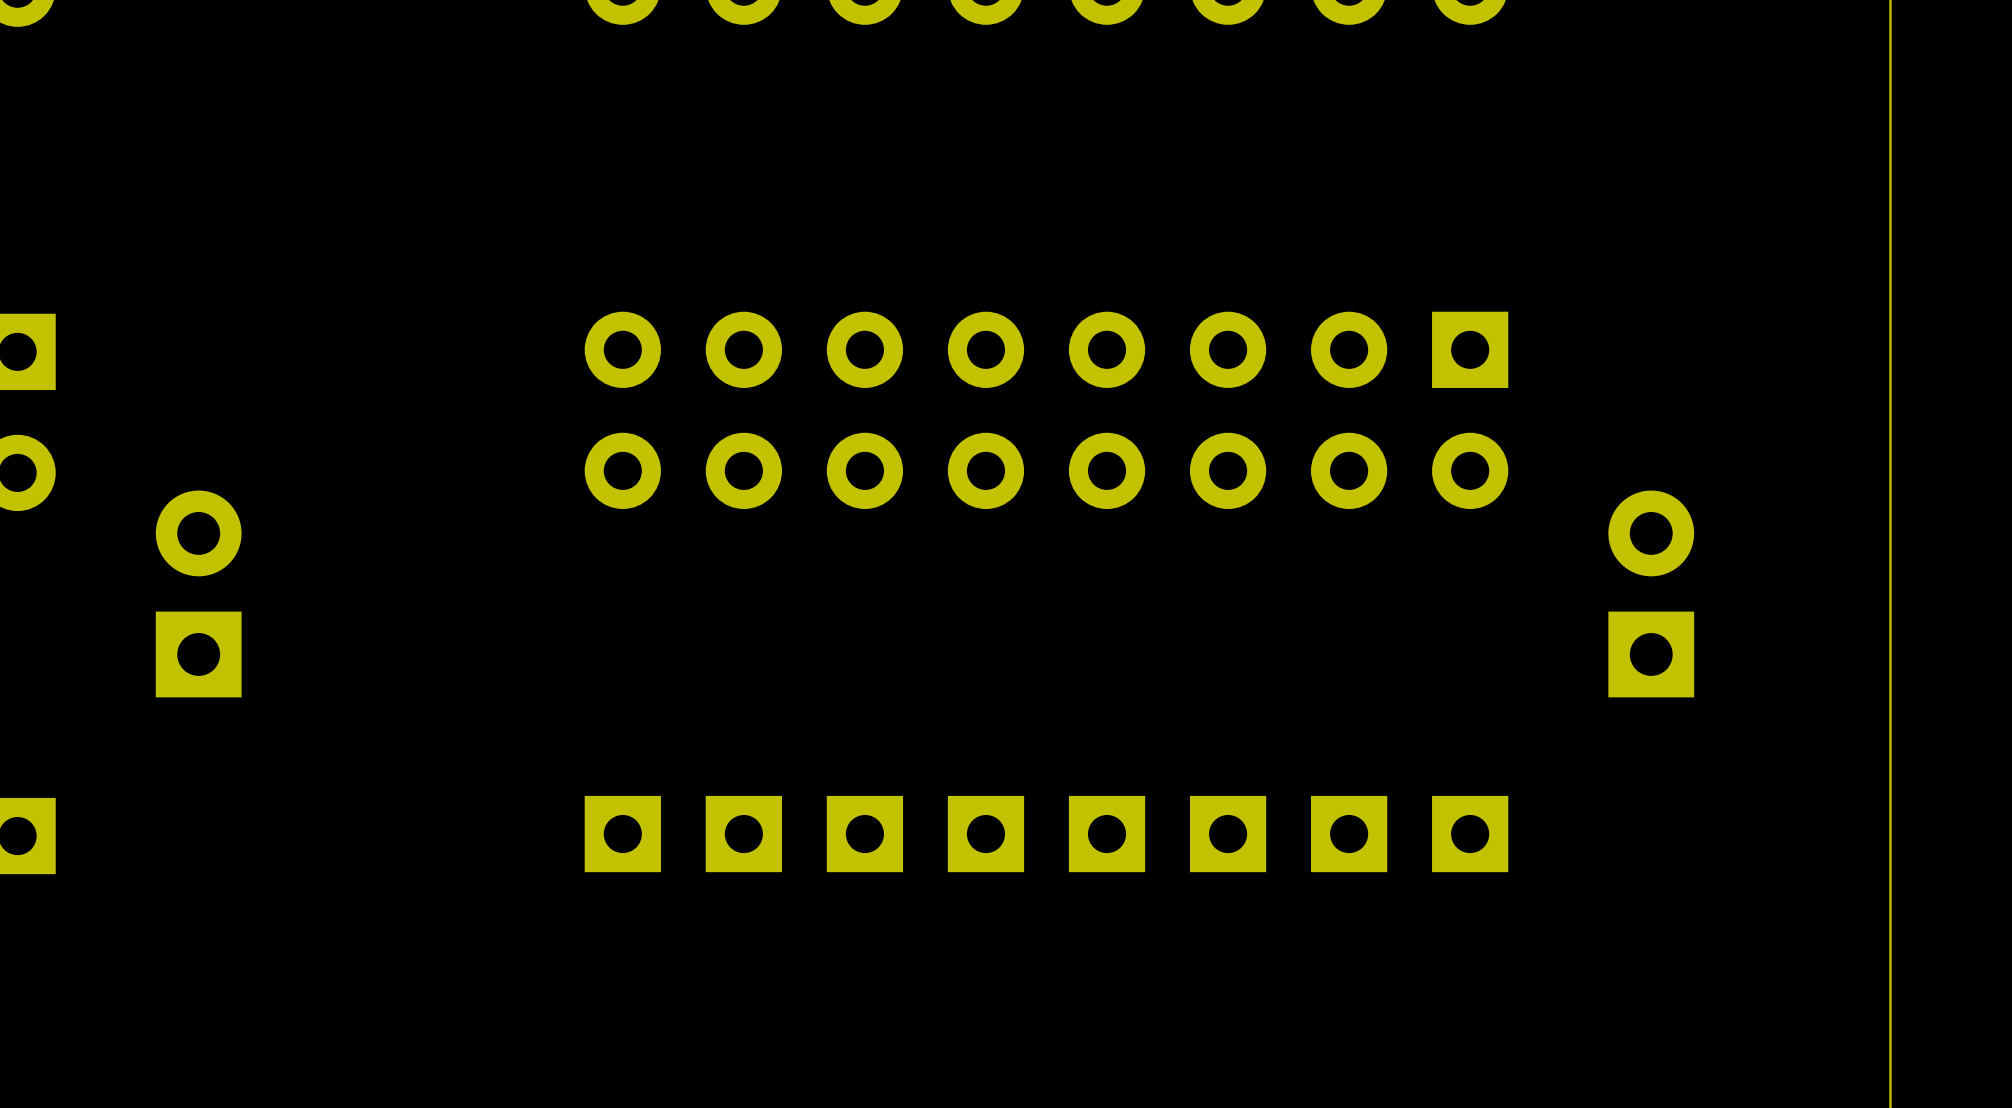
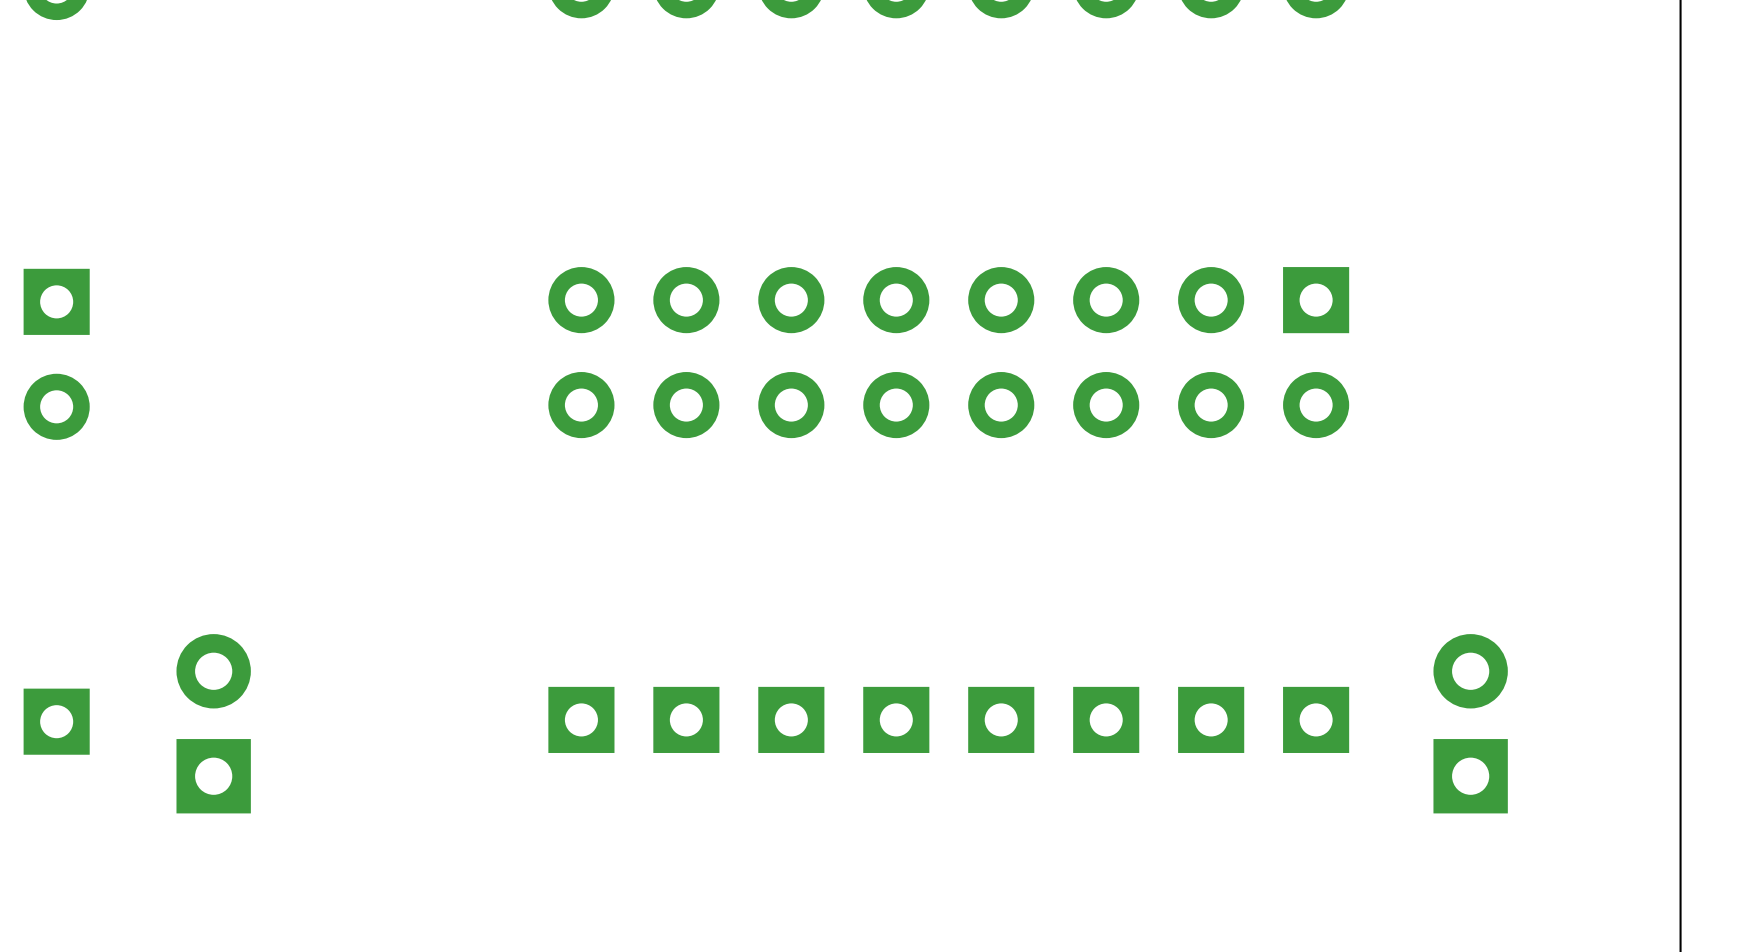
part position: (198, 593) -> (213, 723)
part position: (1651, 593) -> (1470, 723)

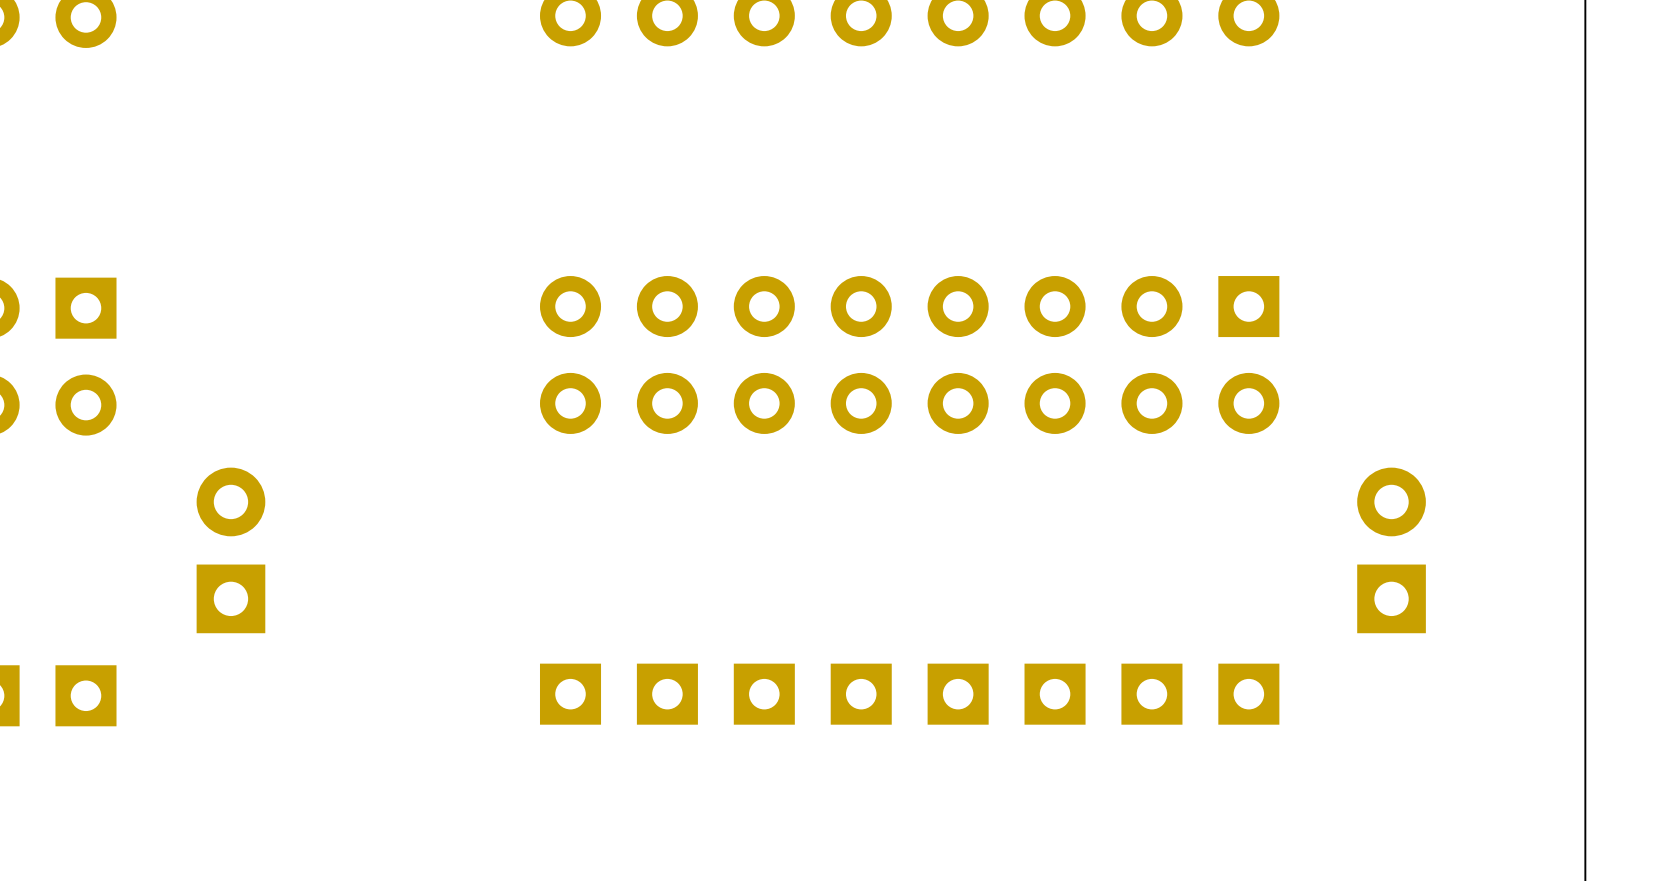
part position: (213, 723) -> (230, 550)
part position: (1470, 723) -> (1391, 550)

